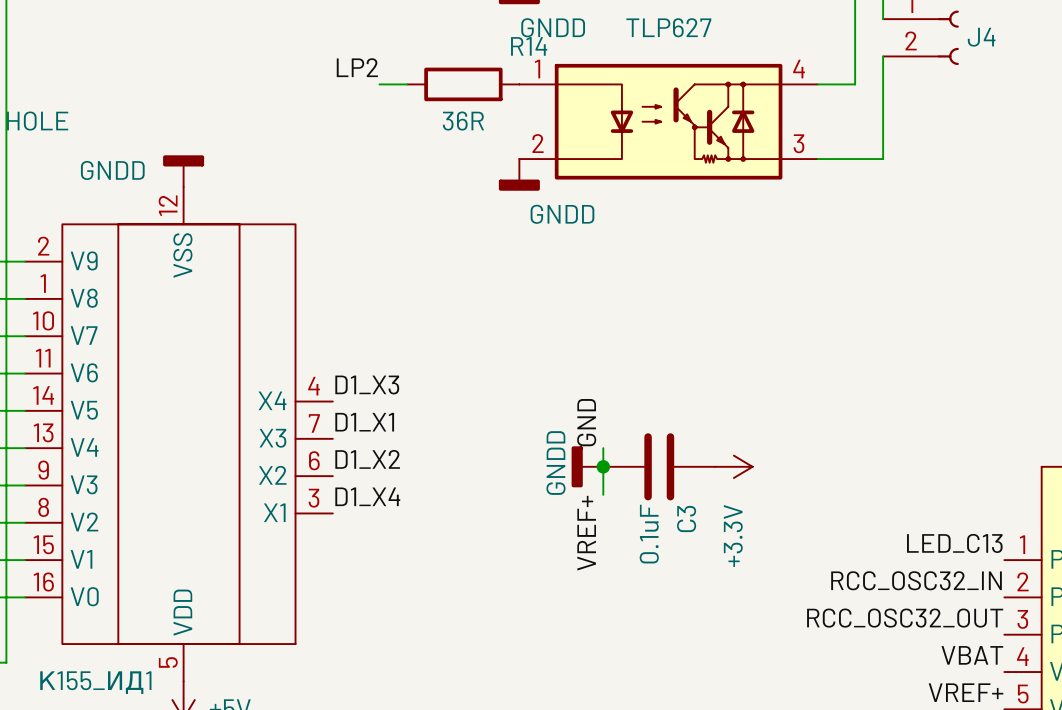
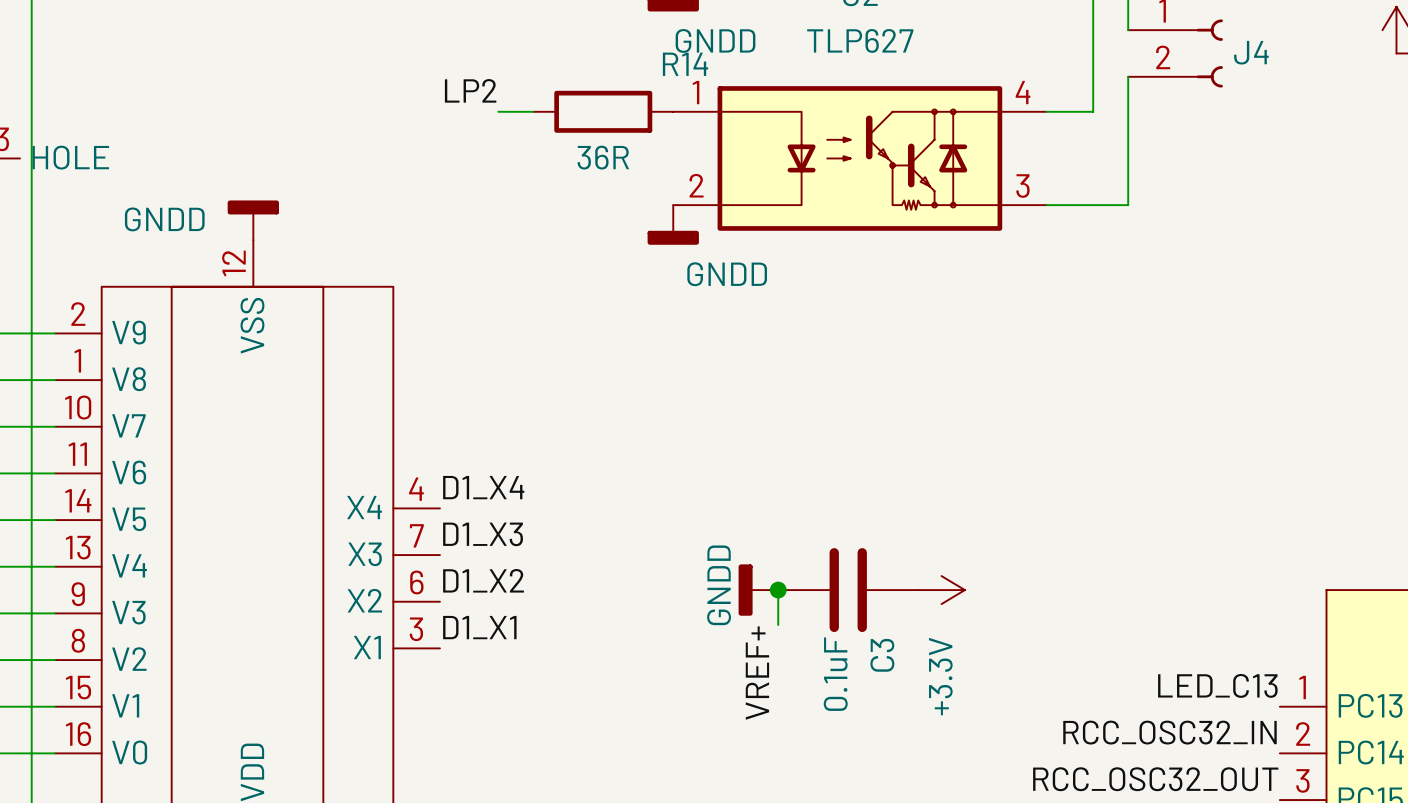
label: D1_X3 (367, 384) -> D1_X4 (483, 487)
label: D1_X1 (364, 422) -> D1_X3 (483, 534)
label: GND (586, 422) -> none
wire: (603, 448) (603, 466) -> none
label: D1_X4 (367, 496) -> D1_X1 (479, 627)

